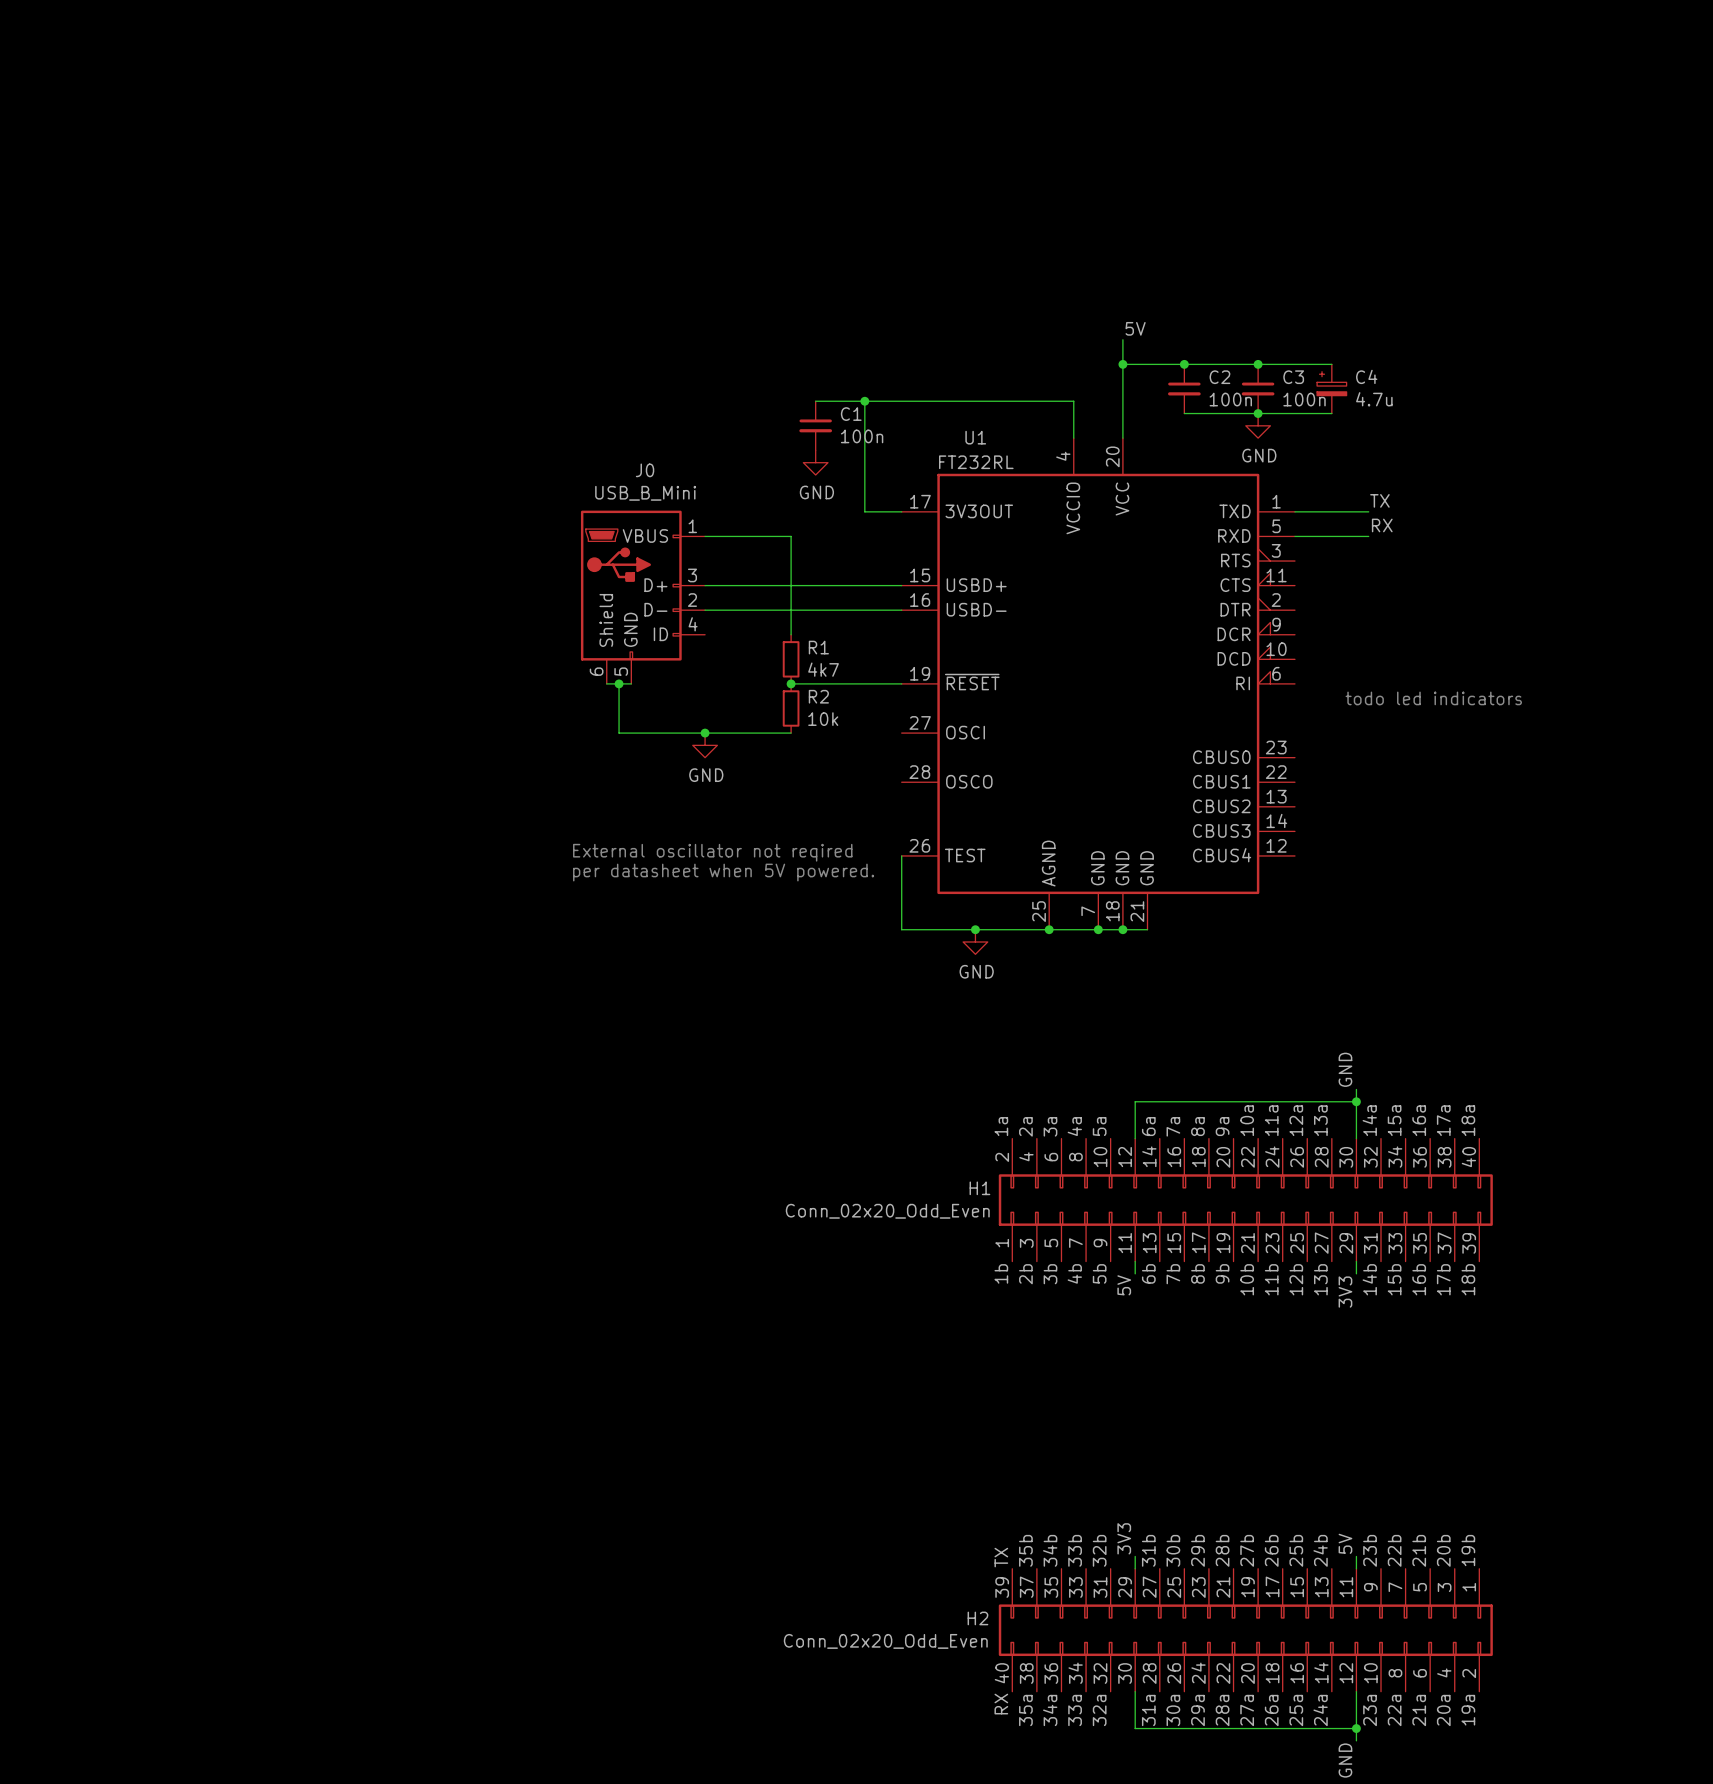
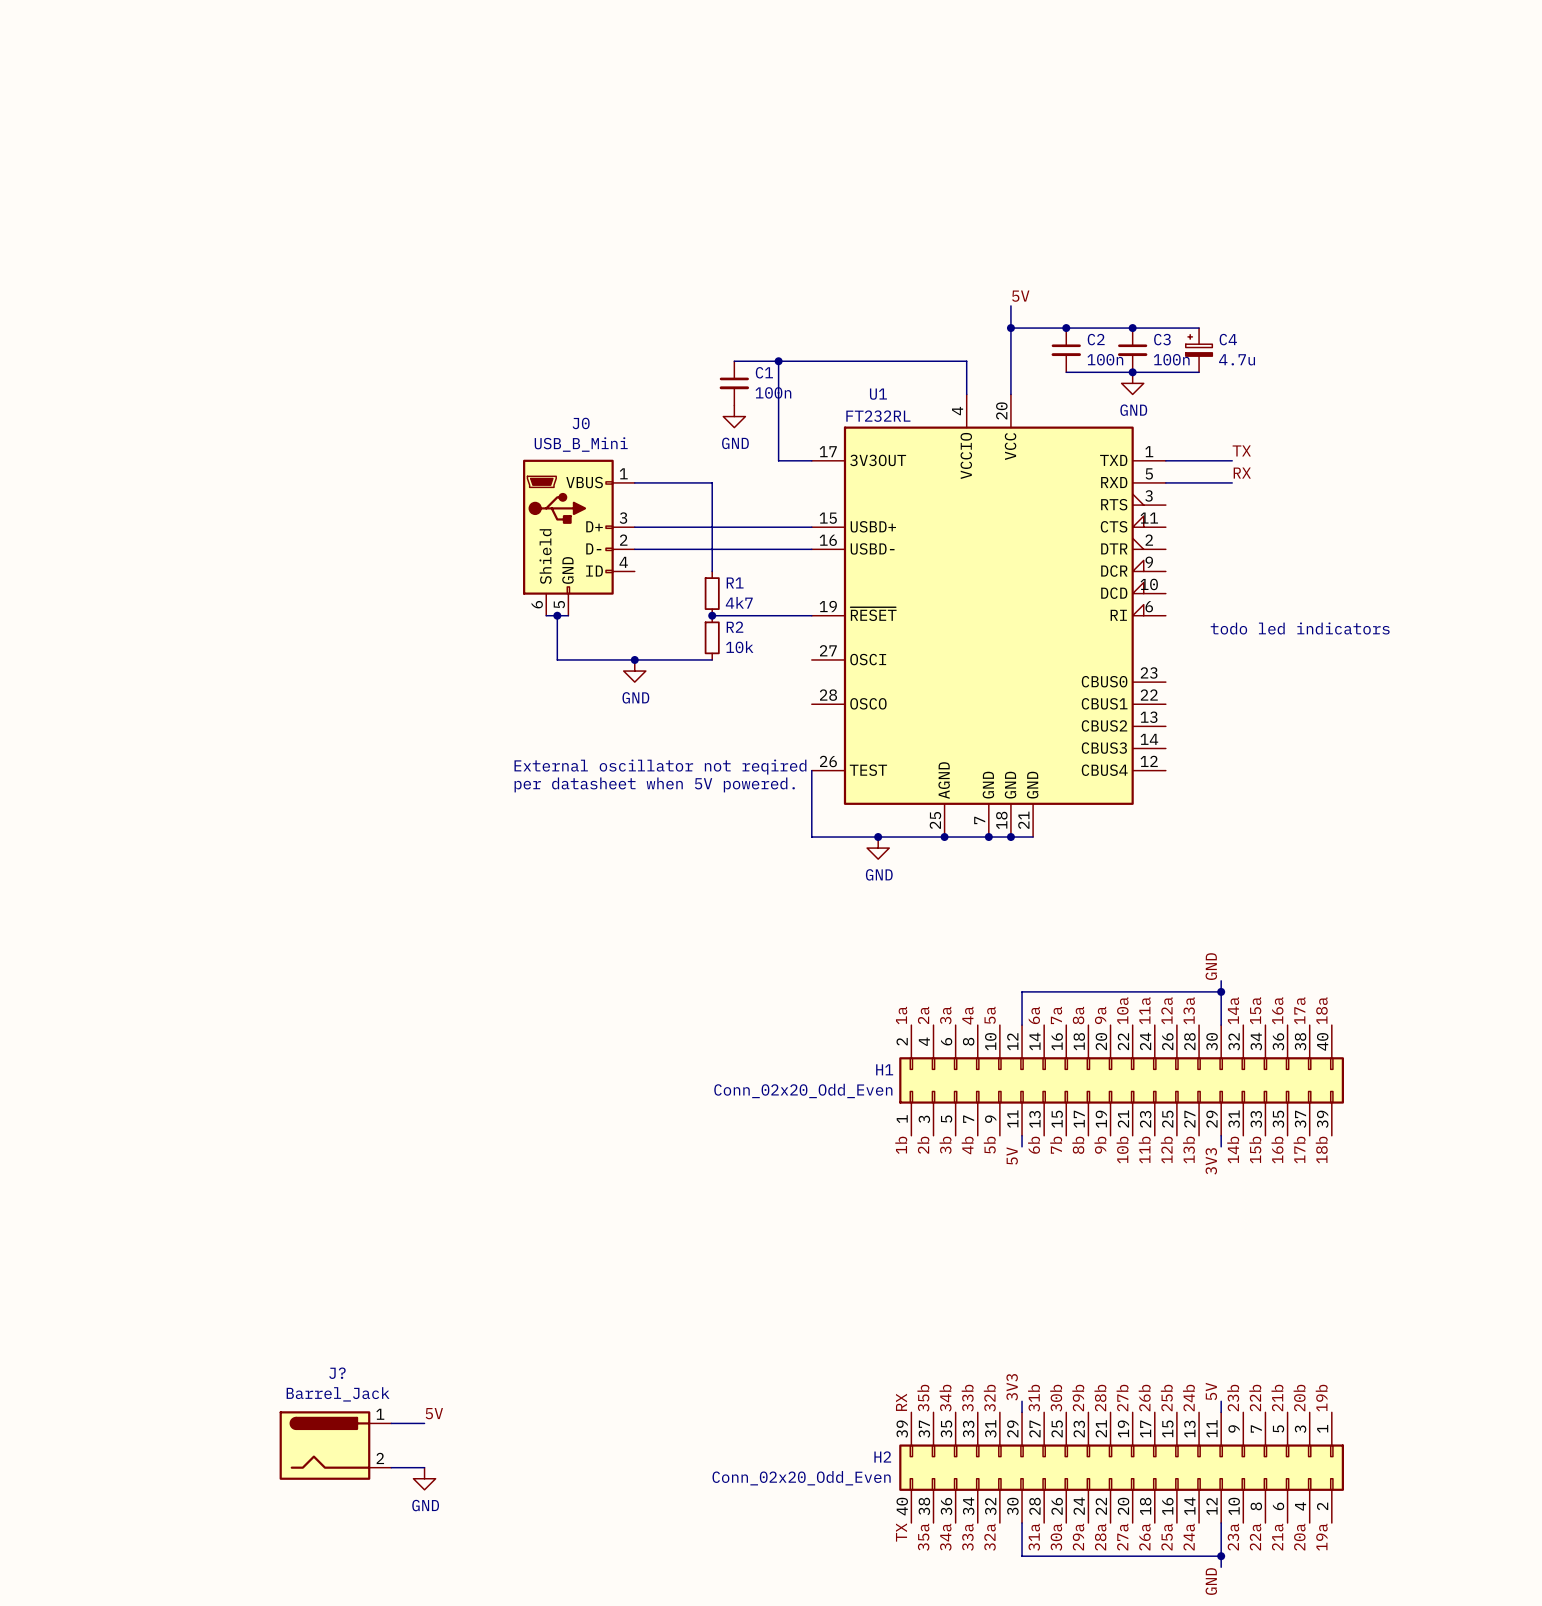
label: TX (1001, 1557) -> RX (901, 1402)
label: none -> 5V (434, 1413)
wire: none -> (391, 1423) (424, 1423)
J?: none -> Barrel_Jack (335, 1445)
wire: none -> (391, 1467) (424, 1467)
power symbol: none -> GND (424, 1478)
label: RX (1001, 1704) -> TX (901, 1532)

